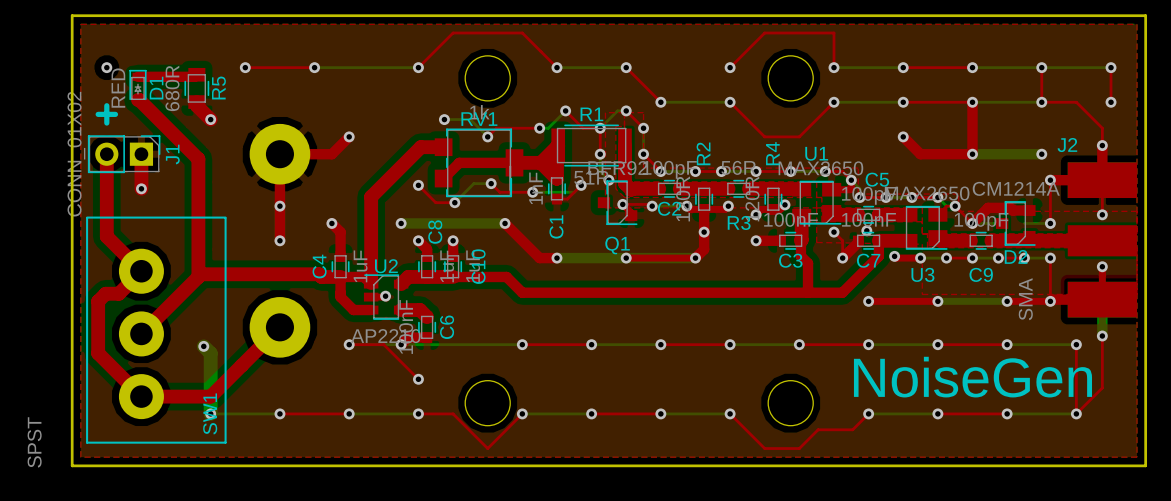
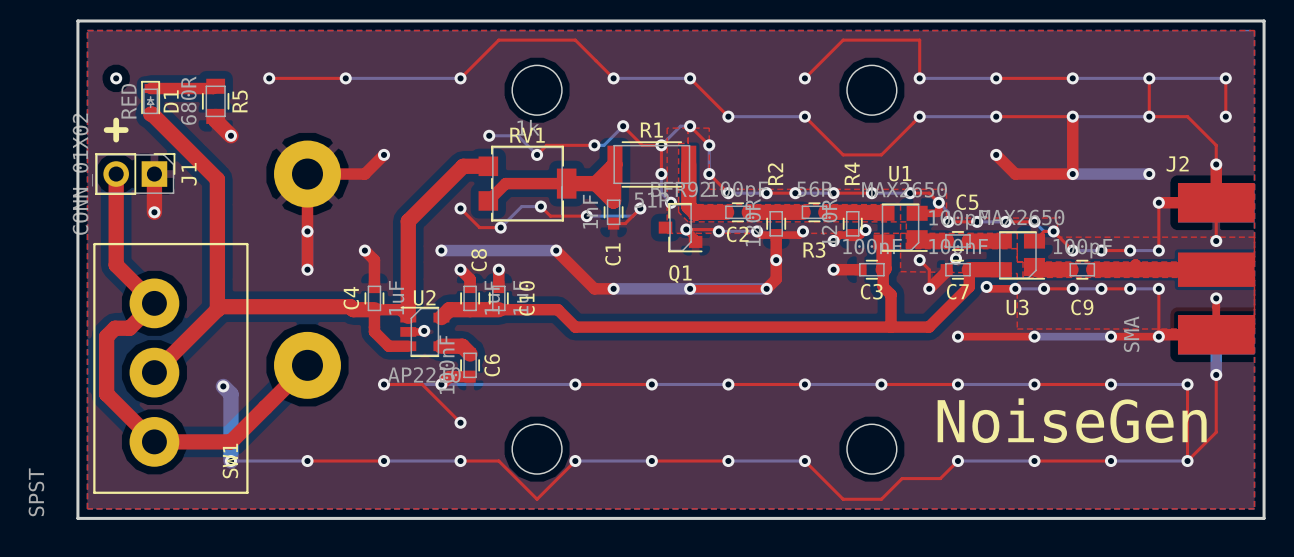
top track: (1029, 210) (988, 207) (972, 223) -> none
top track: none -> (1101, 250) (1130, 250)
via: none -> (1101, 250)
D2: CM1214A (1015, 223) -> none
via: none -> (1130, 250)

